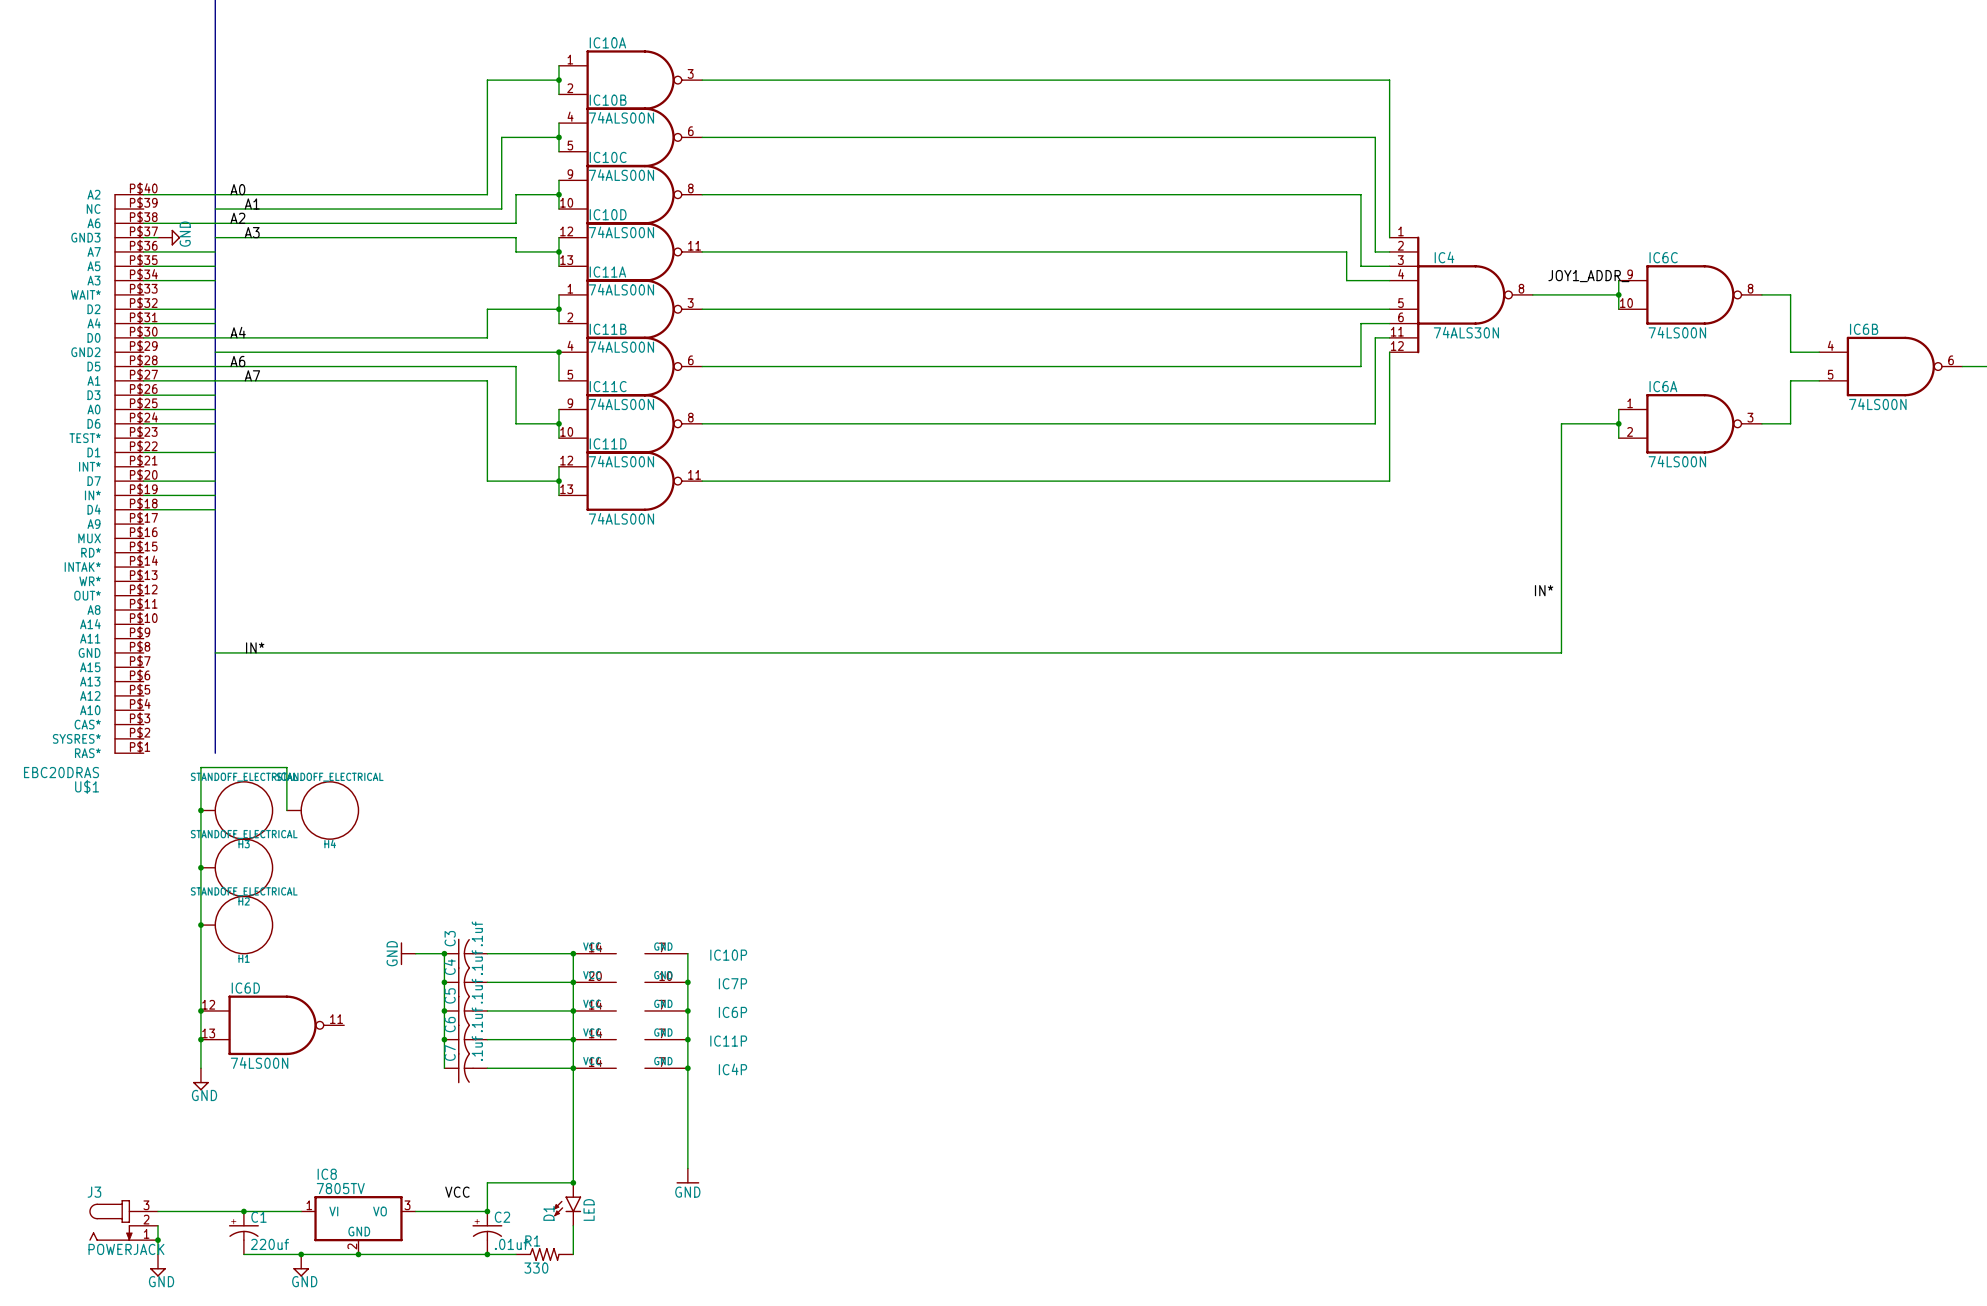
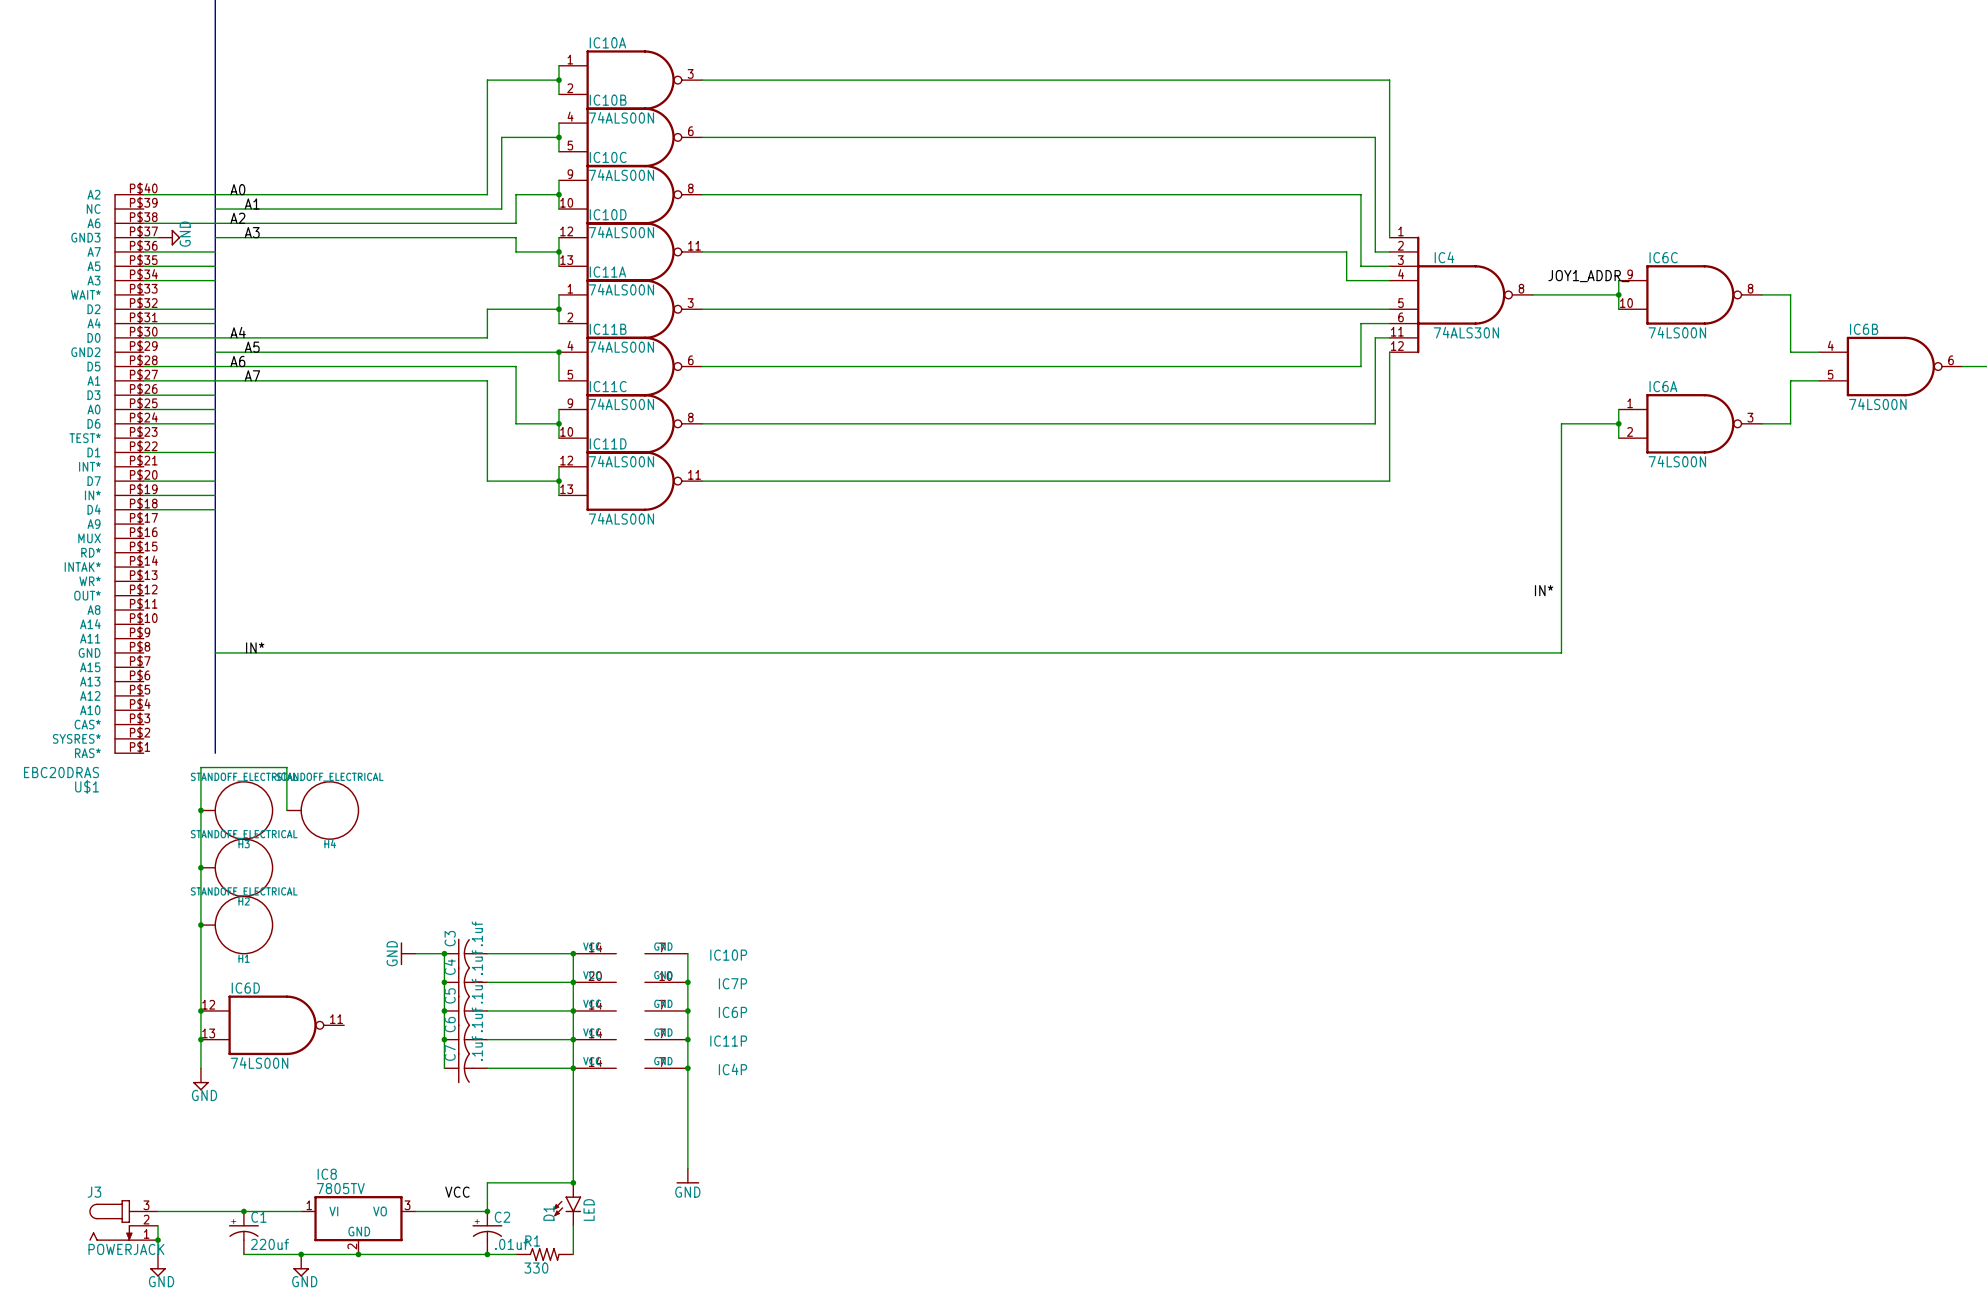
label: none -> A5 (252, 347)

